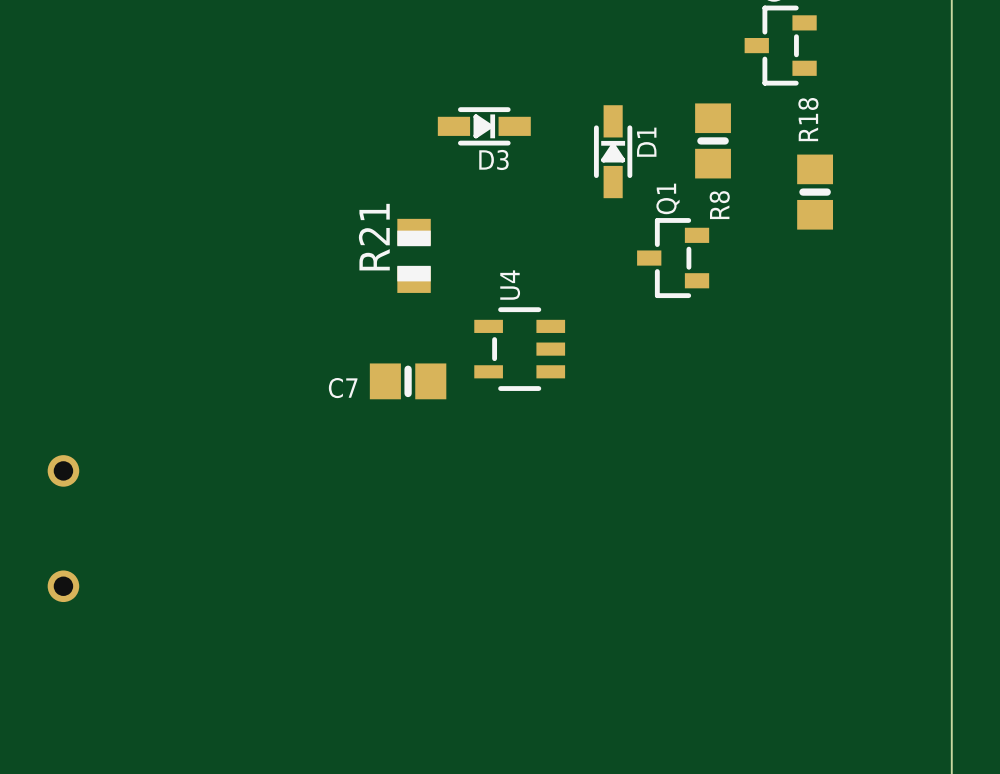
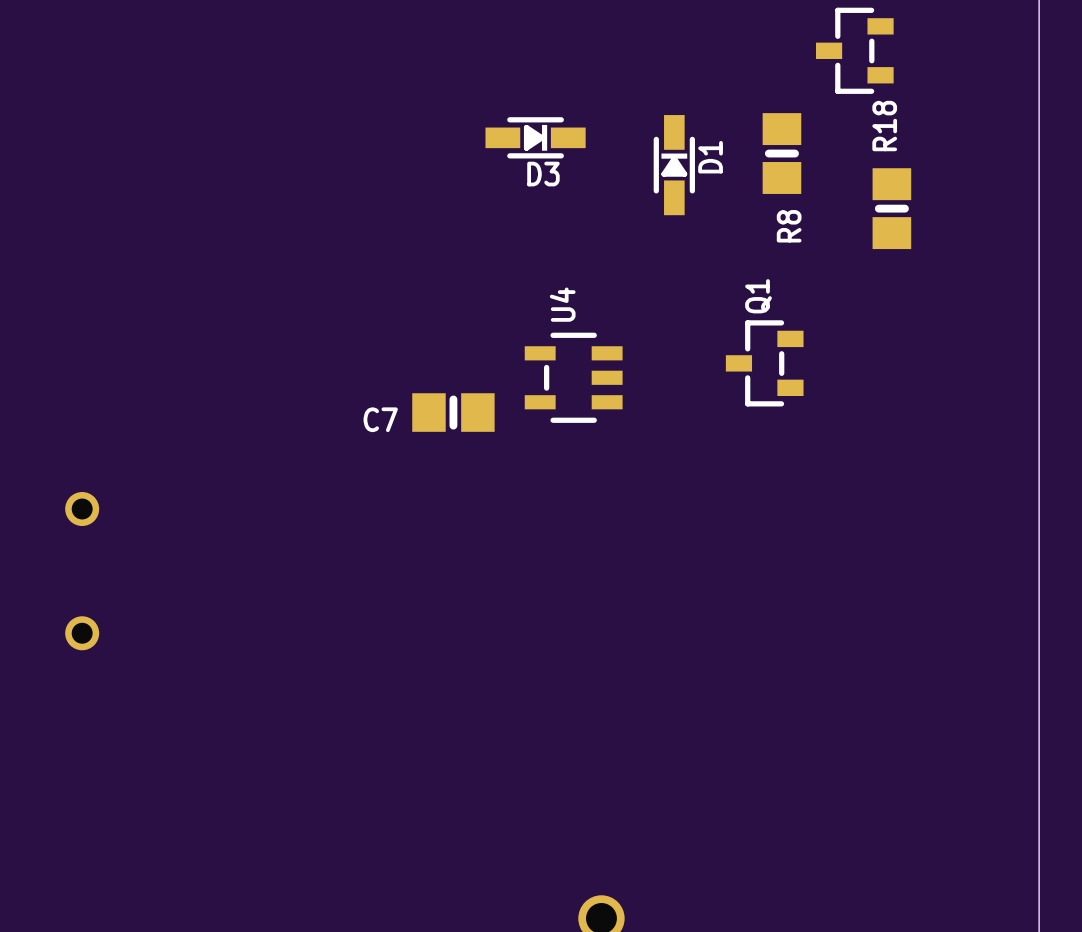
R21: (414, 255) -> none
Q1 position: (673, 258) -> (764, 363)

